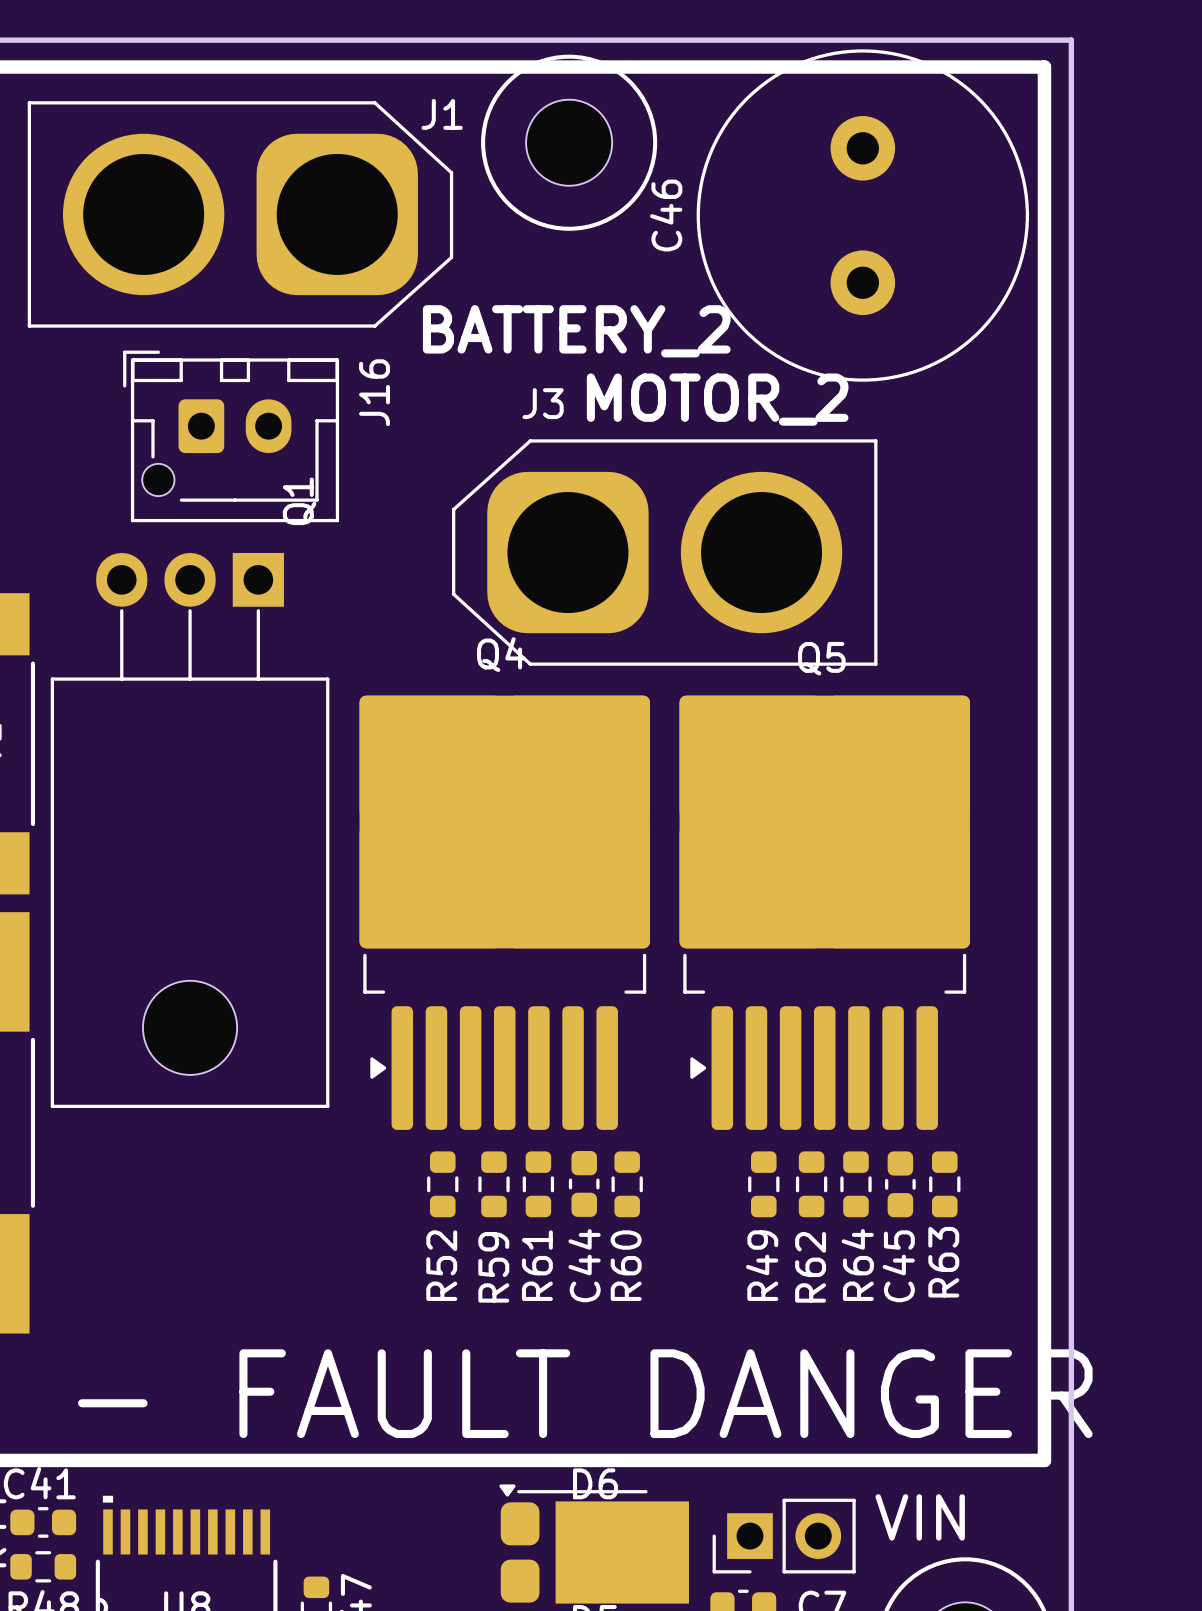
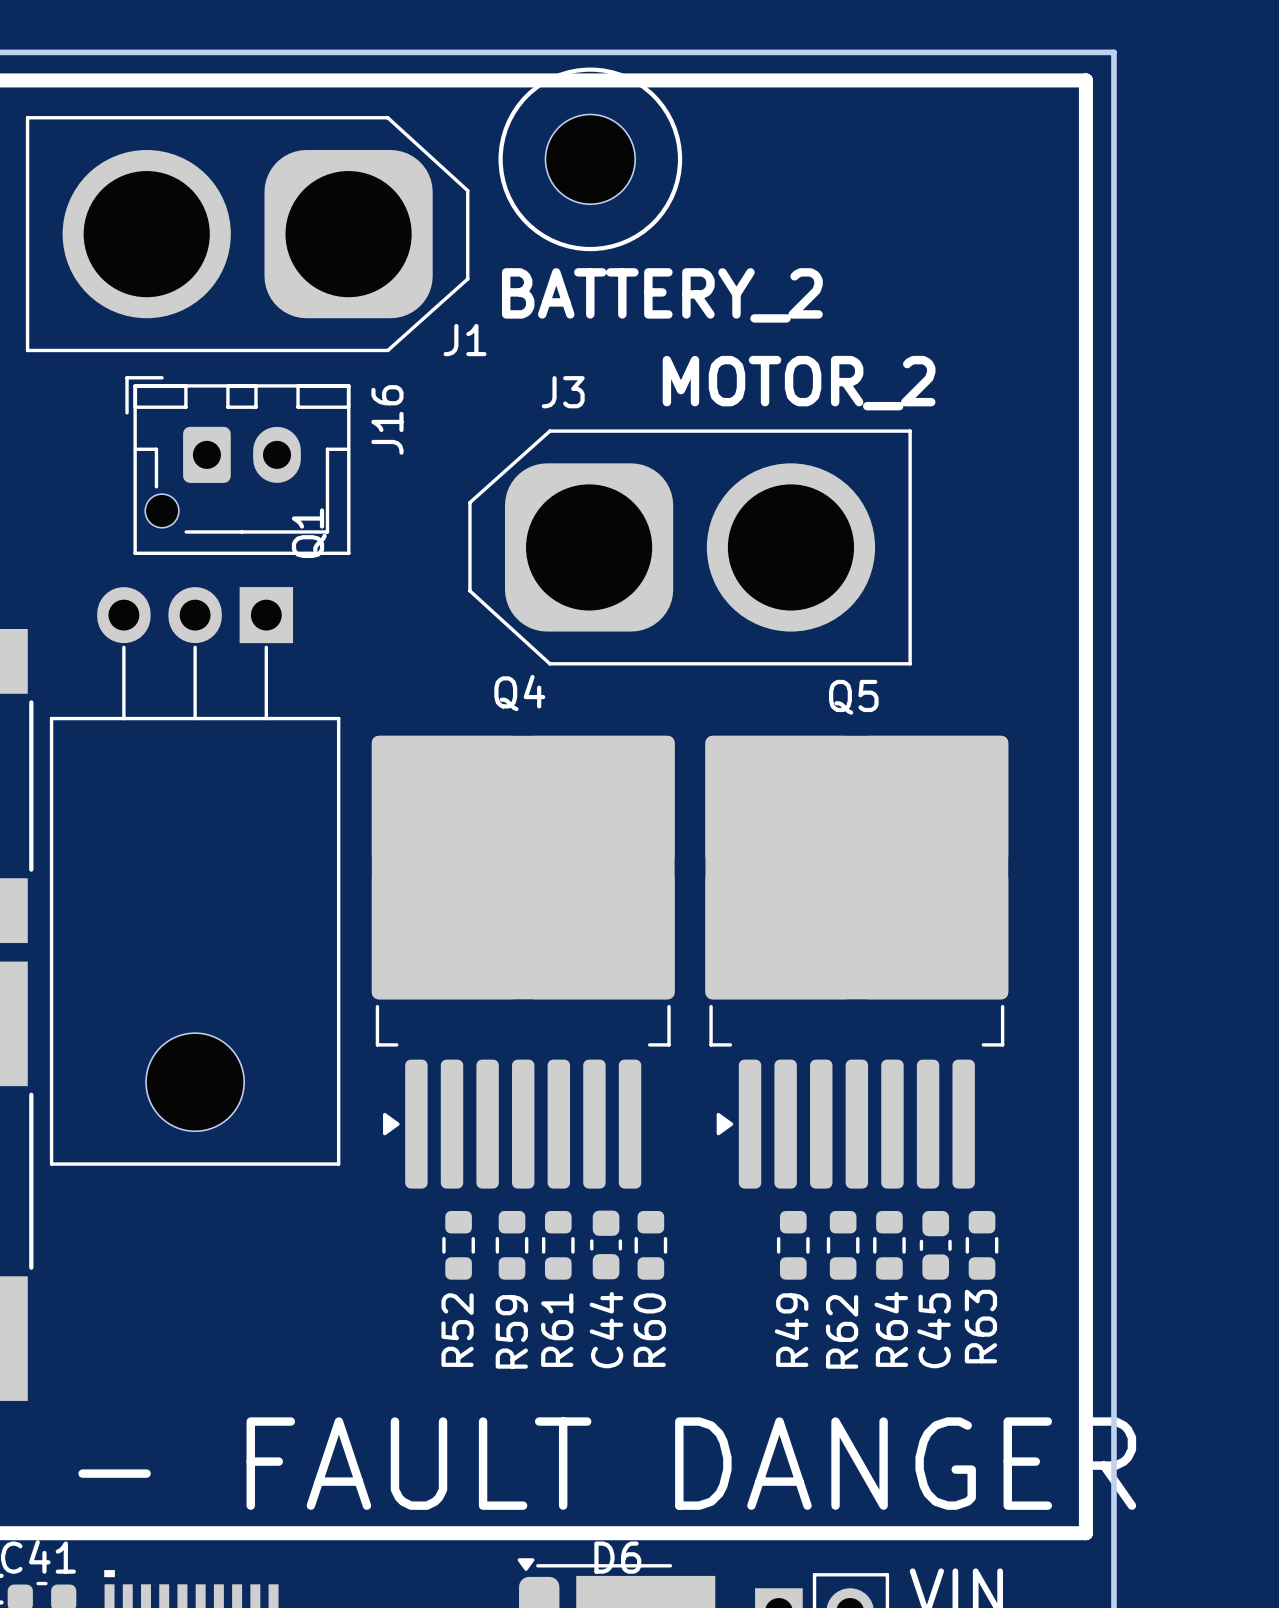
J1 name position: J1 (442, 114) -> J1 (465, 340)
C46: (862, 215) -> none
text position: BATTERY_2 (576, 331) -> BATTERY_2 (662, 295)
text position: MOTOR_2 (717, 399) -> MOTOR_2 (799, 383)
J3 position: (664, 552) -> (690, 547)

